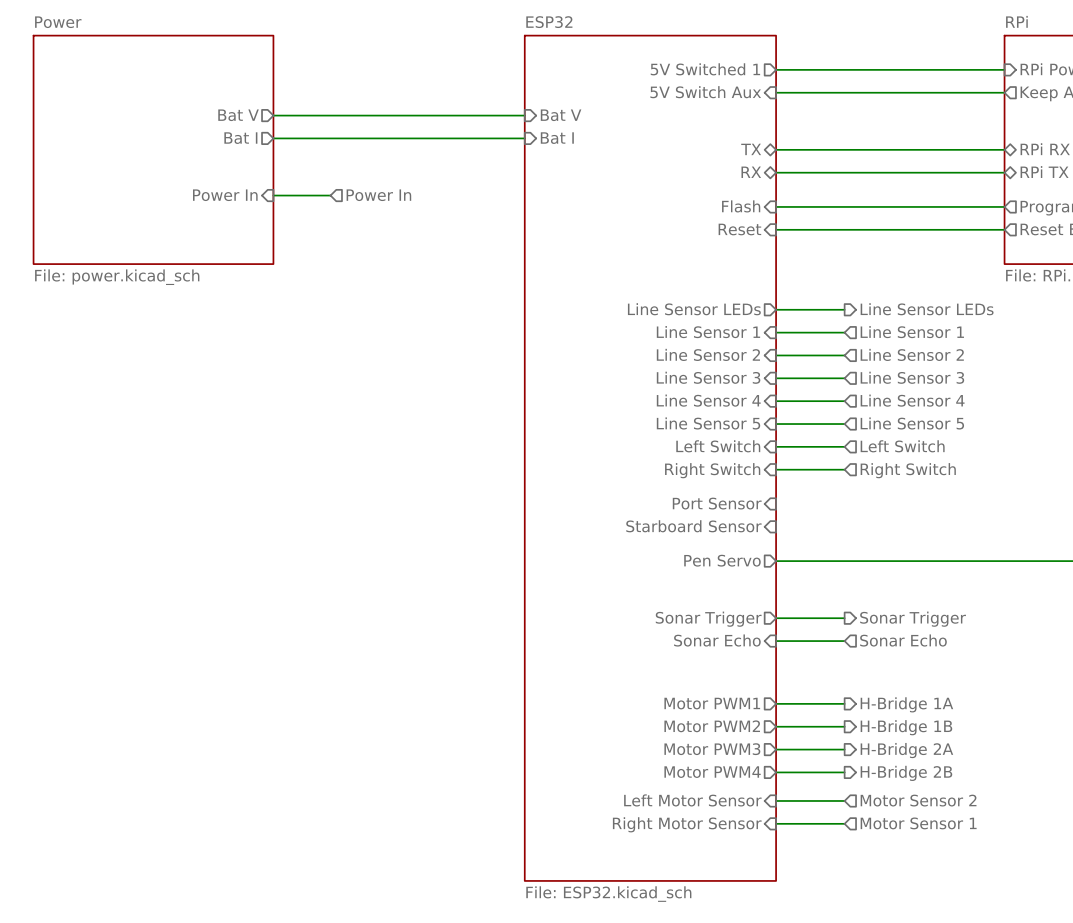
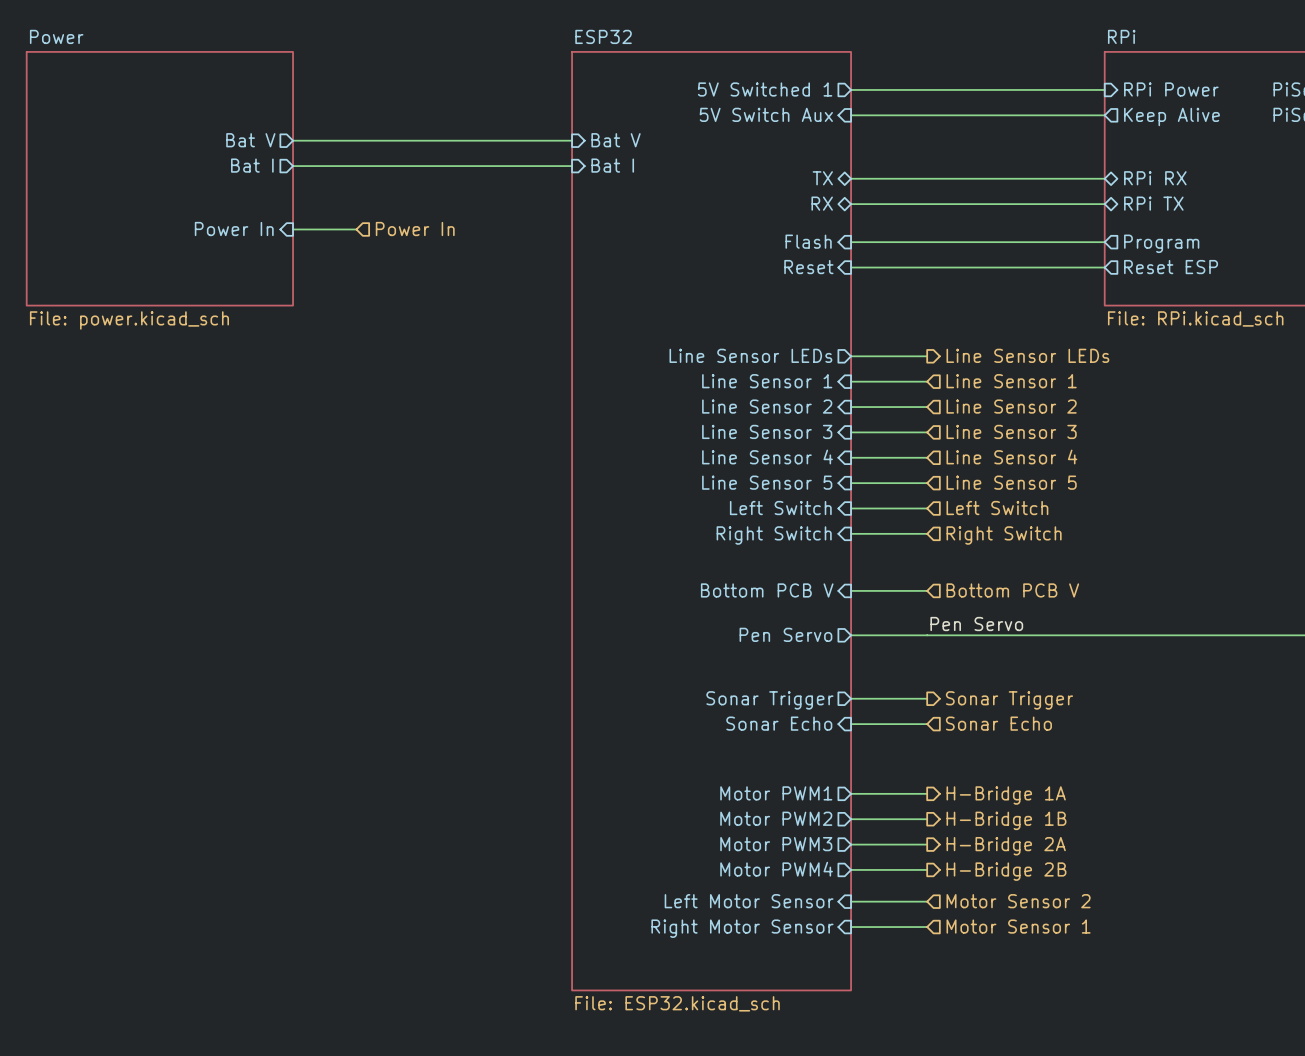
sheet pin: Port Sensor (717, 503) -> none
hierarchical label: none -> Bottom PCB V (1012, 590)
wire: none -> (851, 590) (927, 590)
sheet pin: Starboard Sensor (693, 526) -> Bottom PCB V (767, 590)
label: none -> Pen Servo (976, 624)

